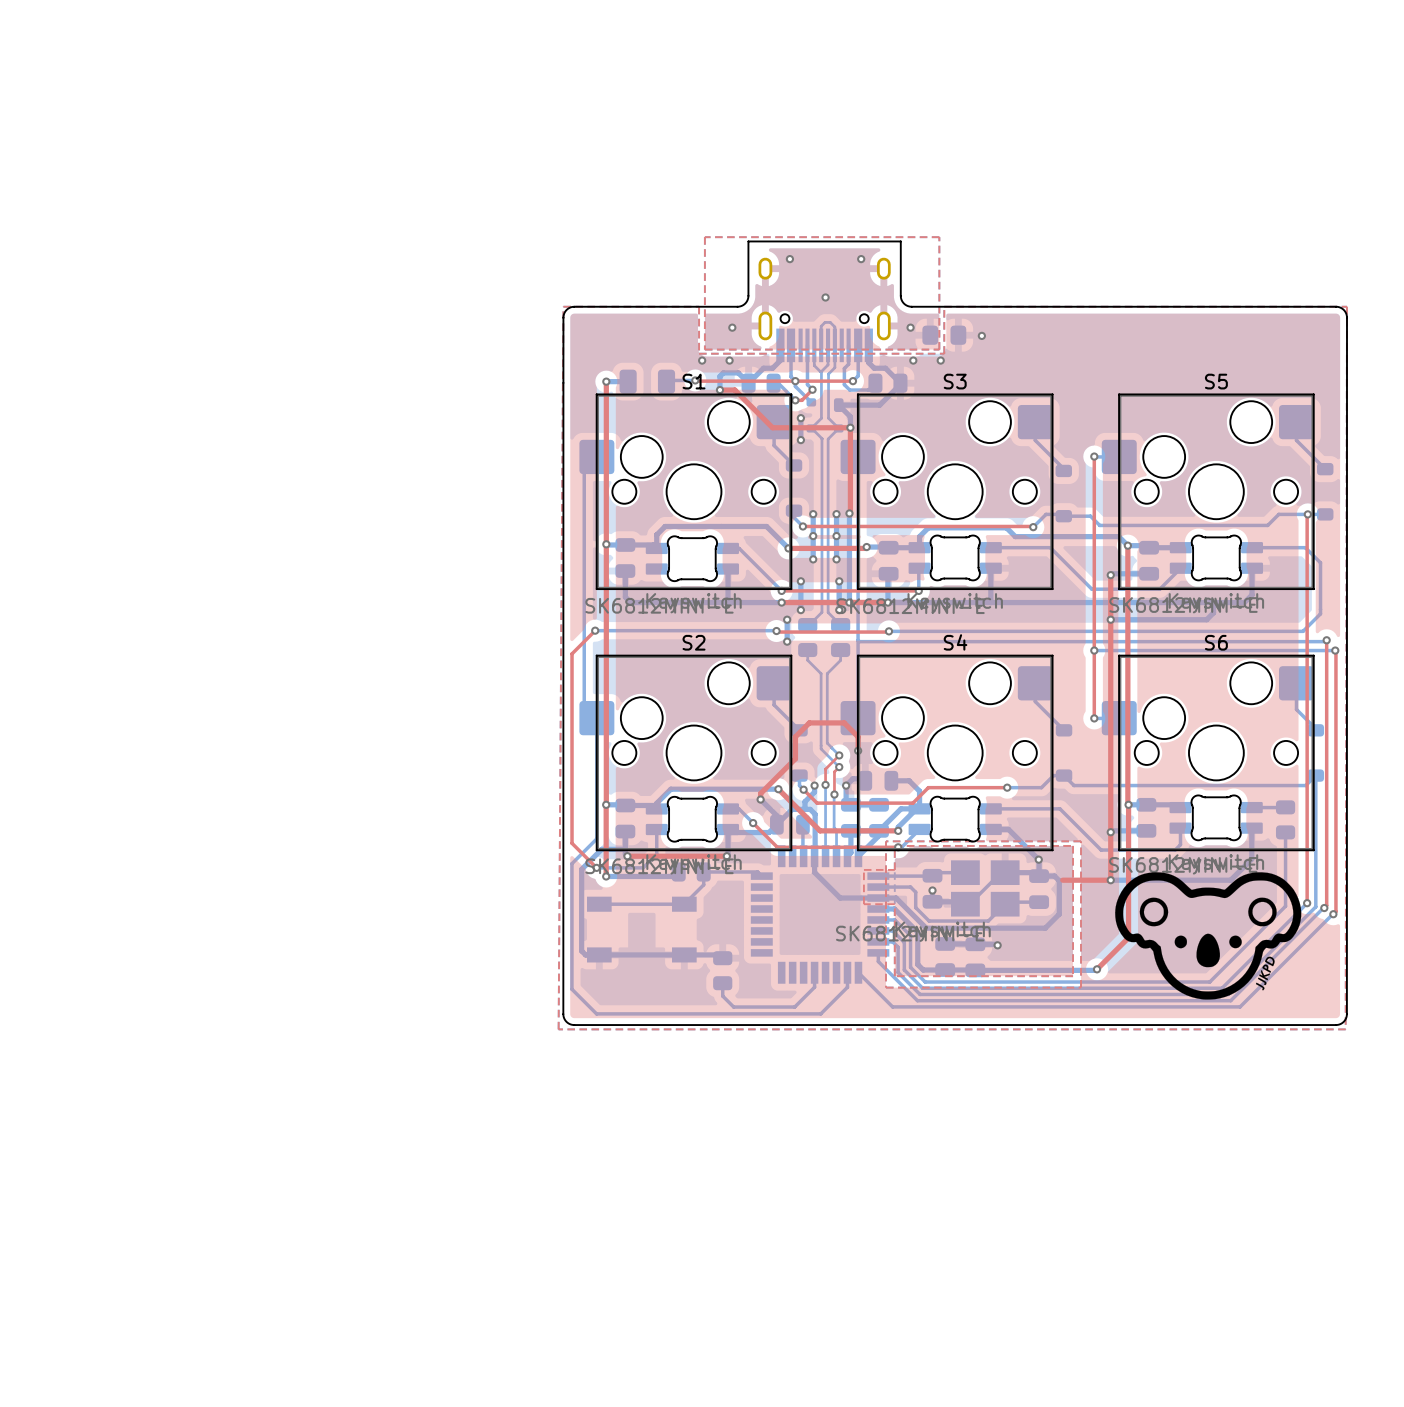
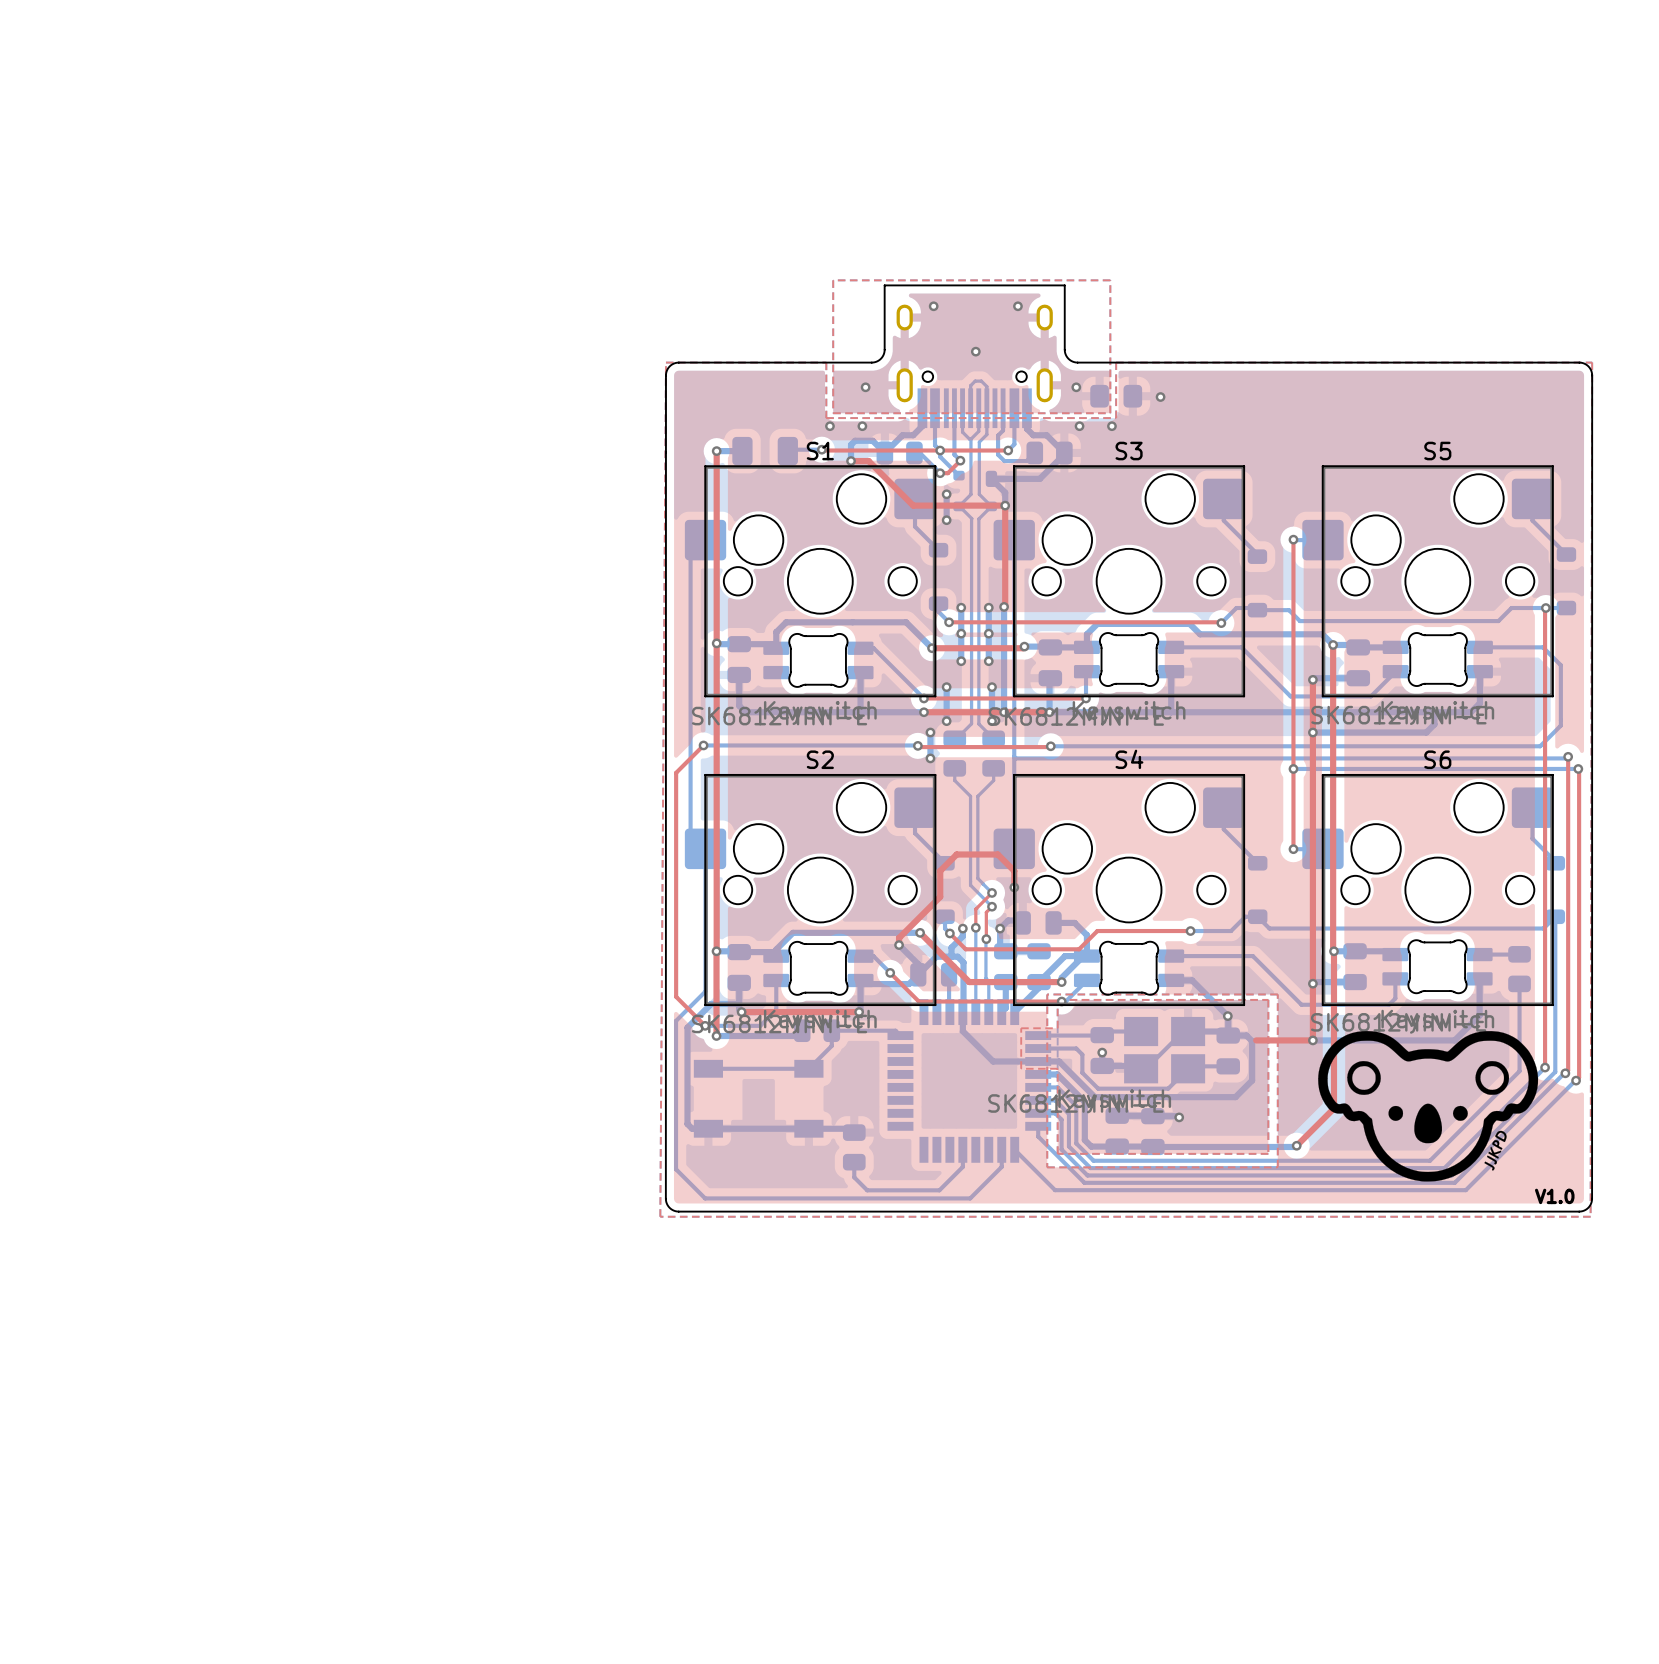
text: none -> V1.0 (1554, 1196)

